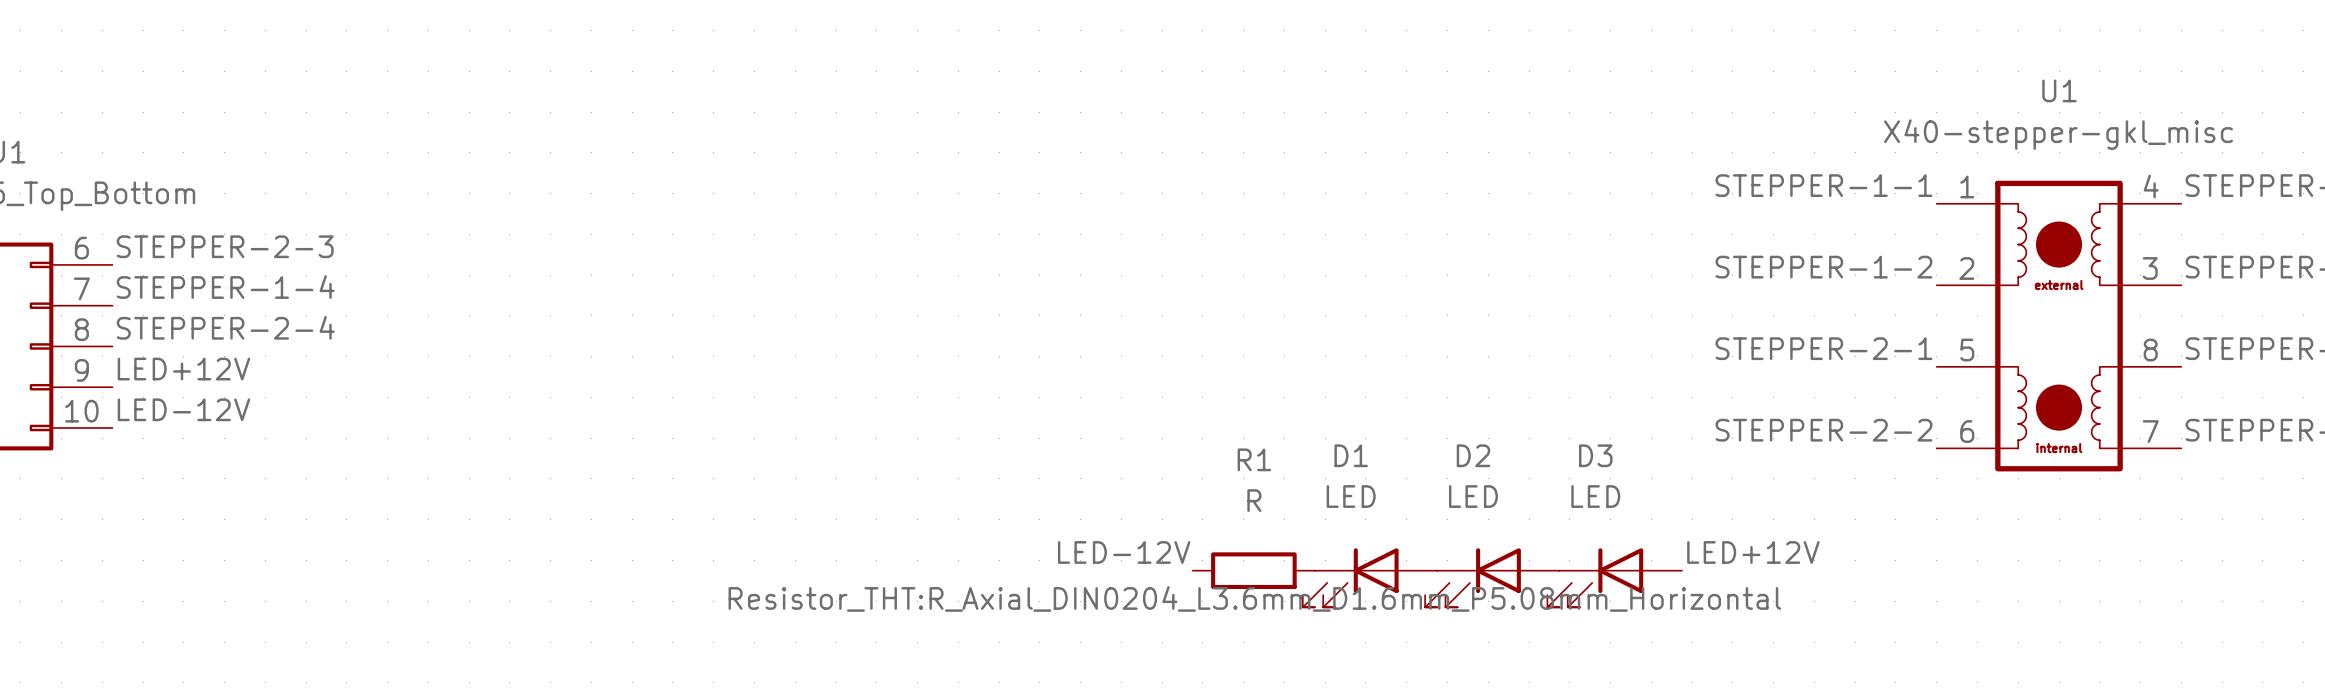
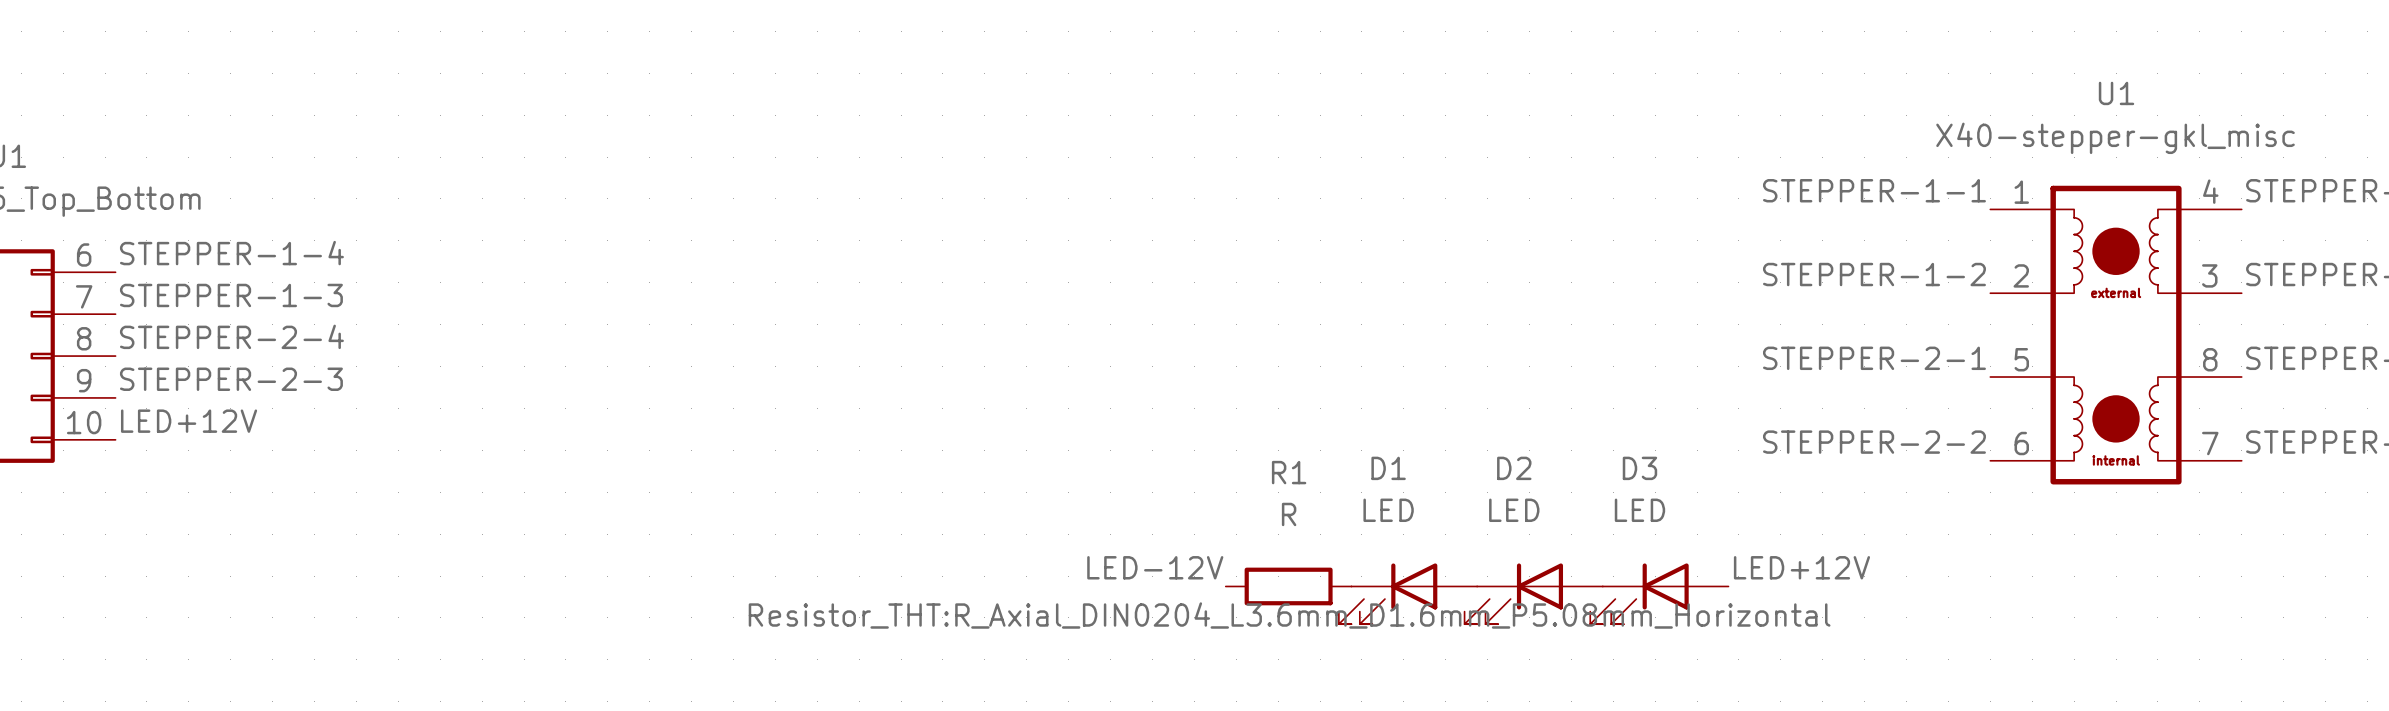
label: STEPPER-2-3 (225, 246) -> STEPPER-1-4 (231, 253)
label: STEPPER-1-4 (225, 287) -> STEPPER-1-3 (231, 295)
label: LED+12V (183, 369) -> STEPPER-2-3 (231, 379)
label: LED-12V (183, 409) -> LED+12V (189, 421)

